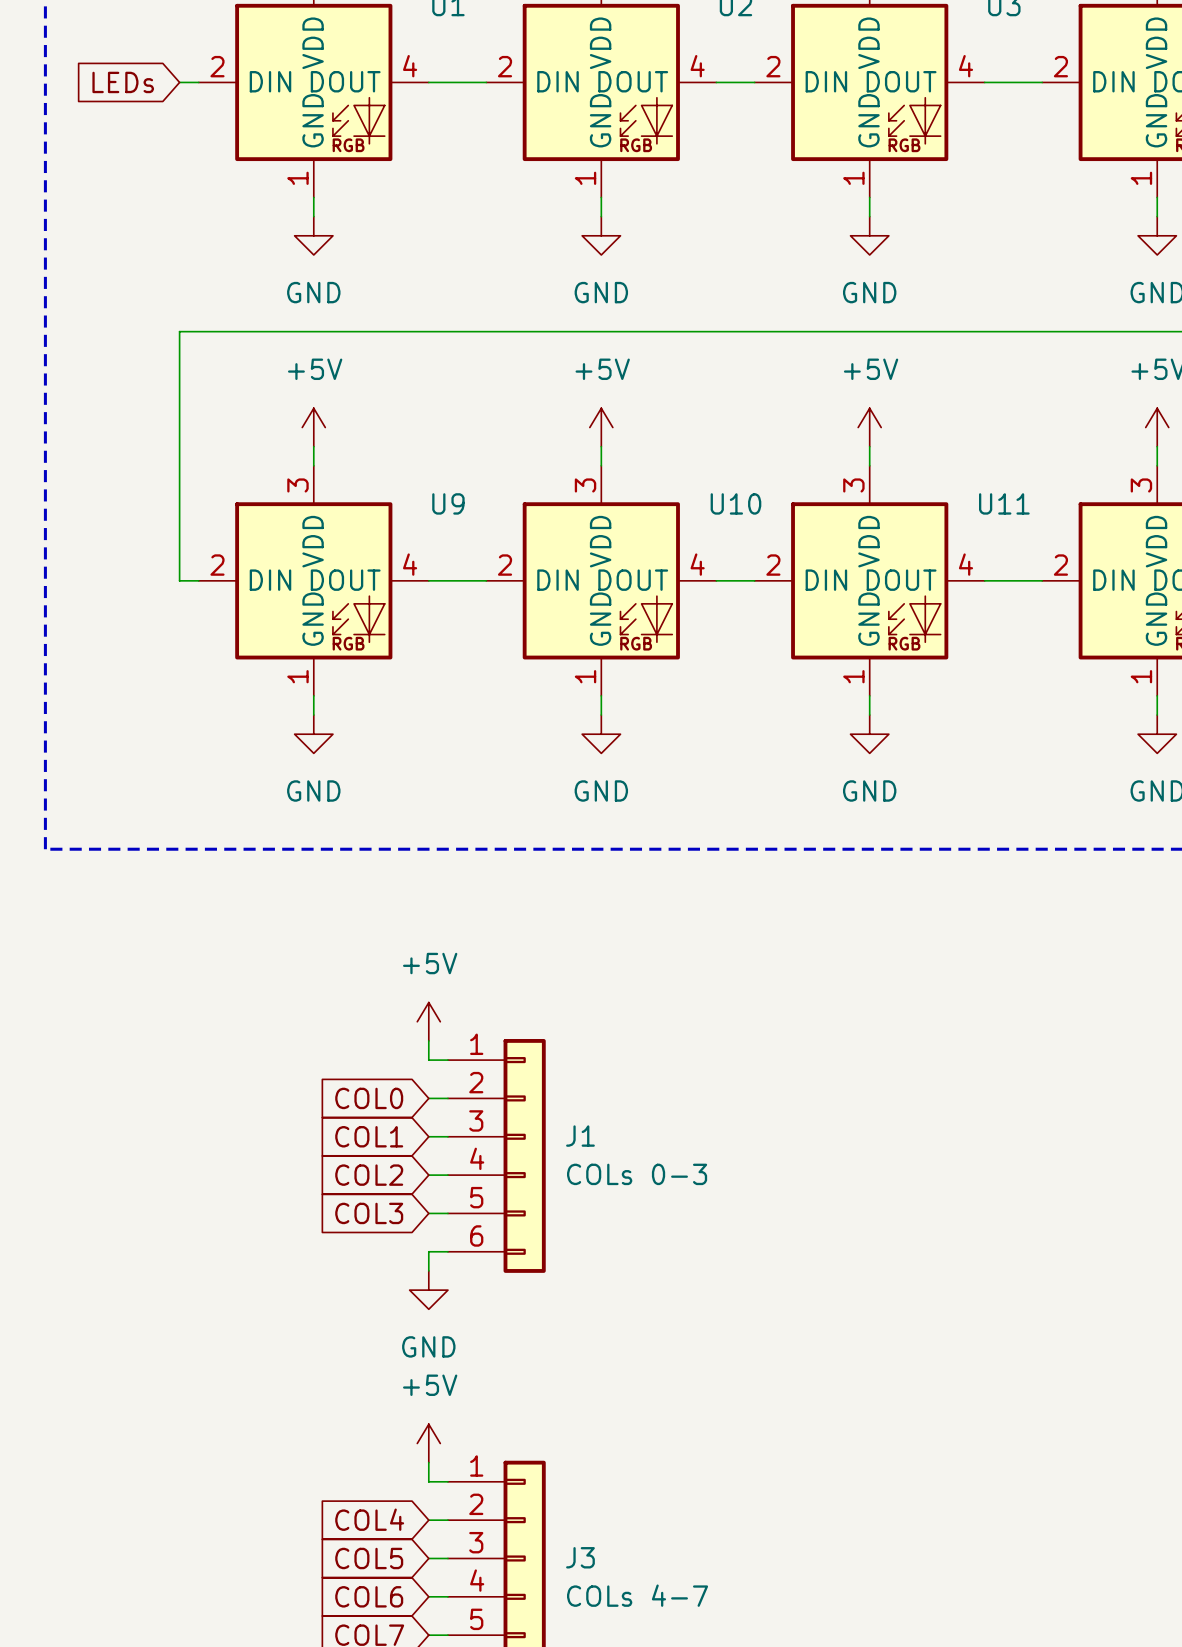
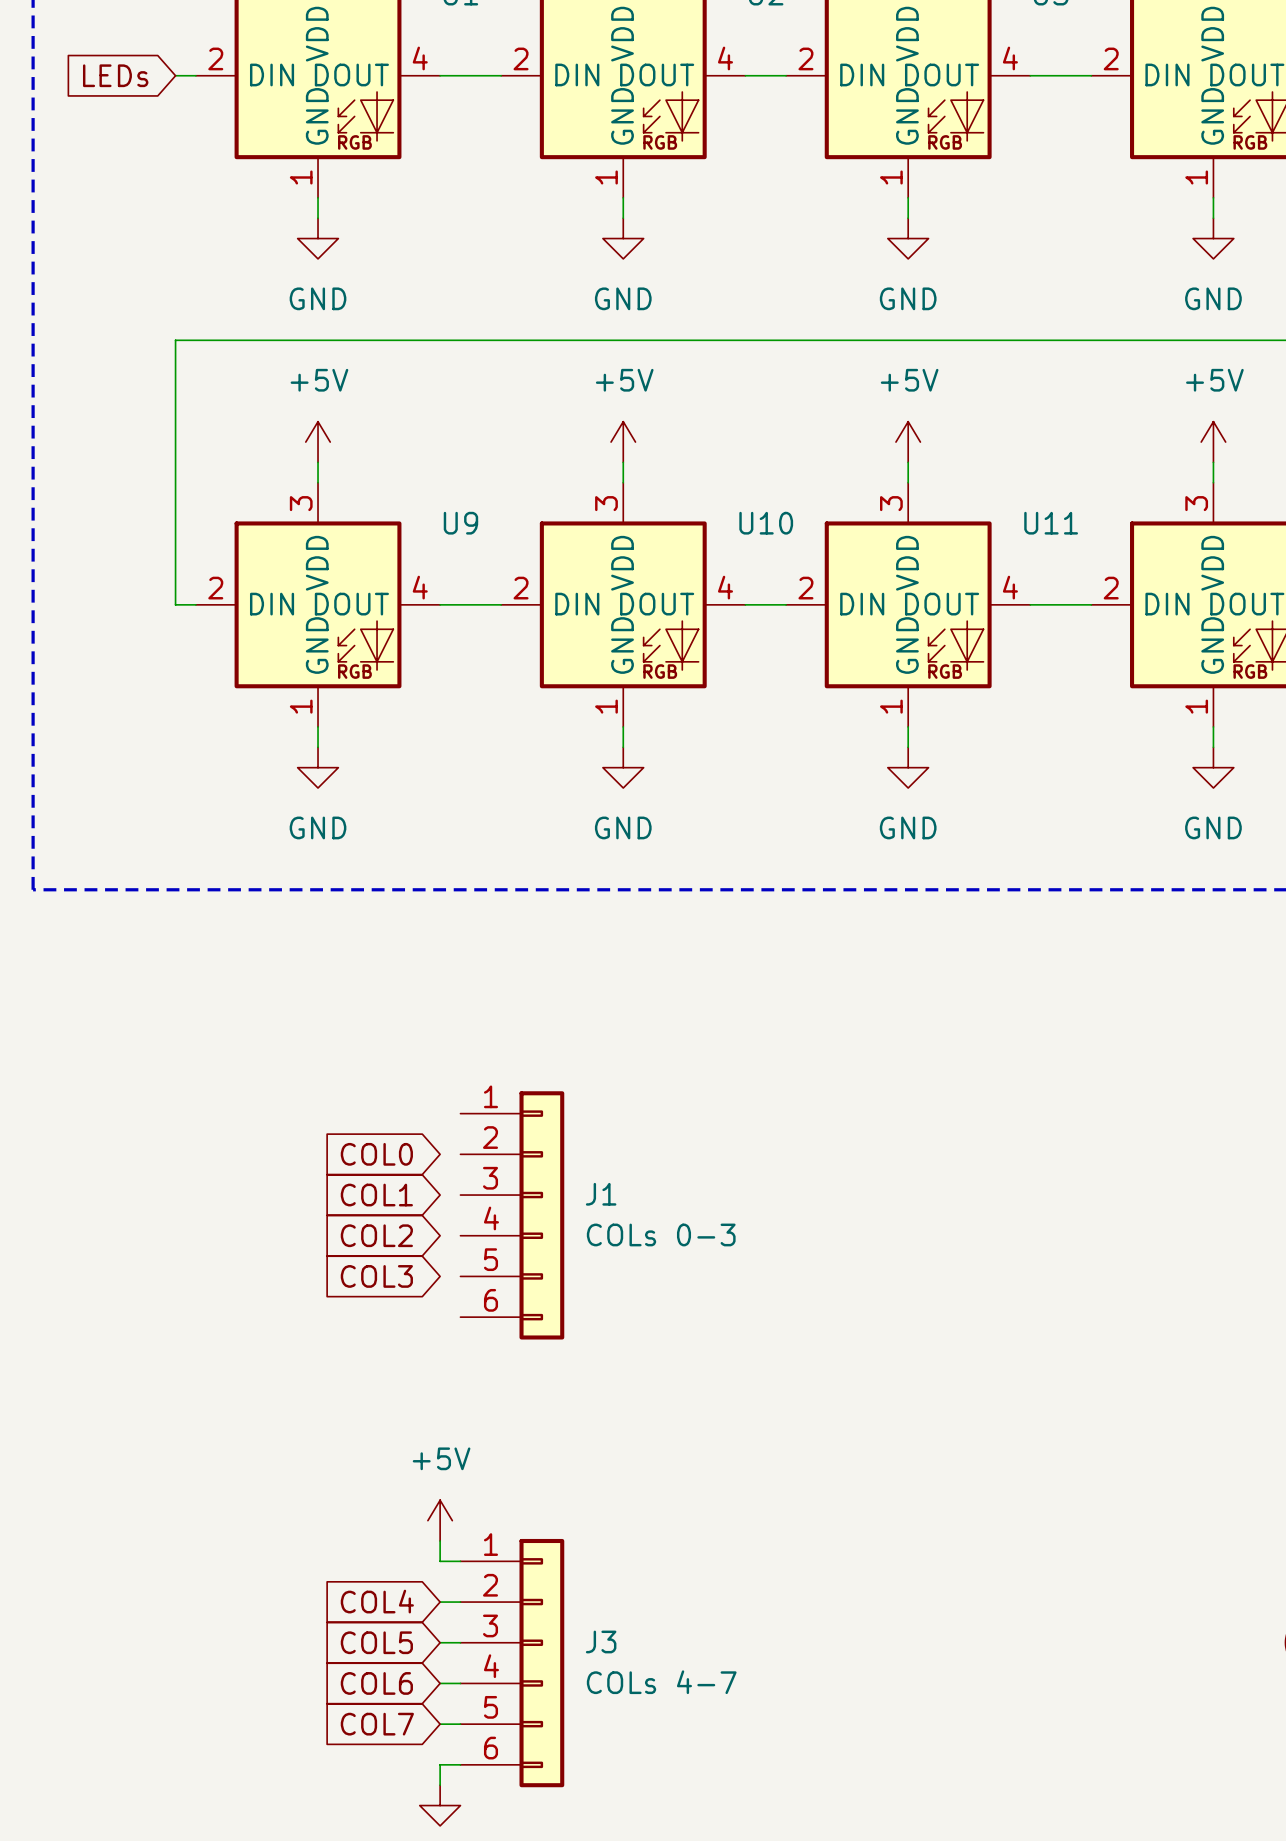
power symbol: +5V (428, 1021) -> none
wire: (428, 1040) (428, 1060) (447, 1060) -> none
wire: (428, 1098) (447, 1098) -> none
wire: (428, 1136) (447, 1136) -> none
wire: (428, 1175) (447, 1175) -> none
wire: (428, 1213) (447, 1213) -> none
wire: (447, 1251) (428, 1251) (428, 1270) -> none
power symbol: GND (428, 1290) -> none

